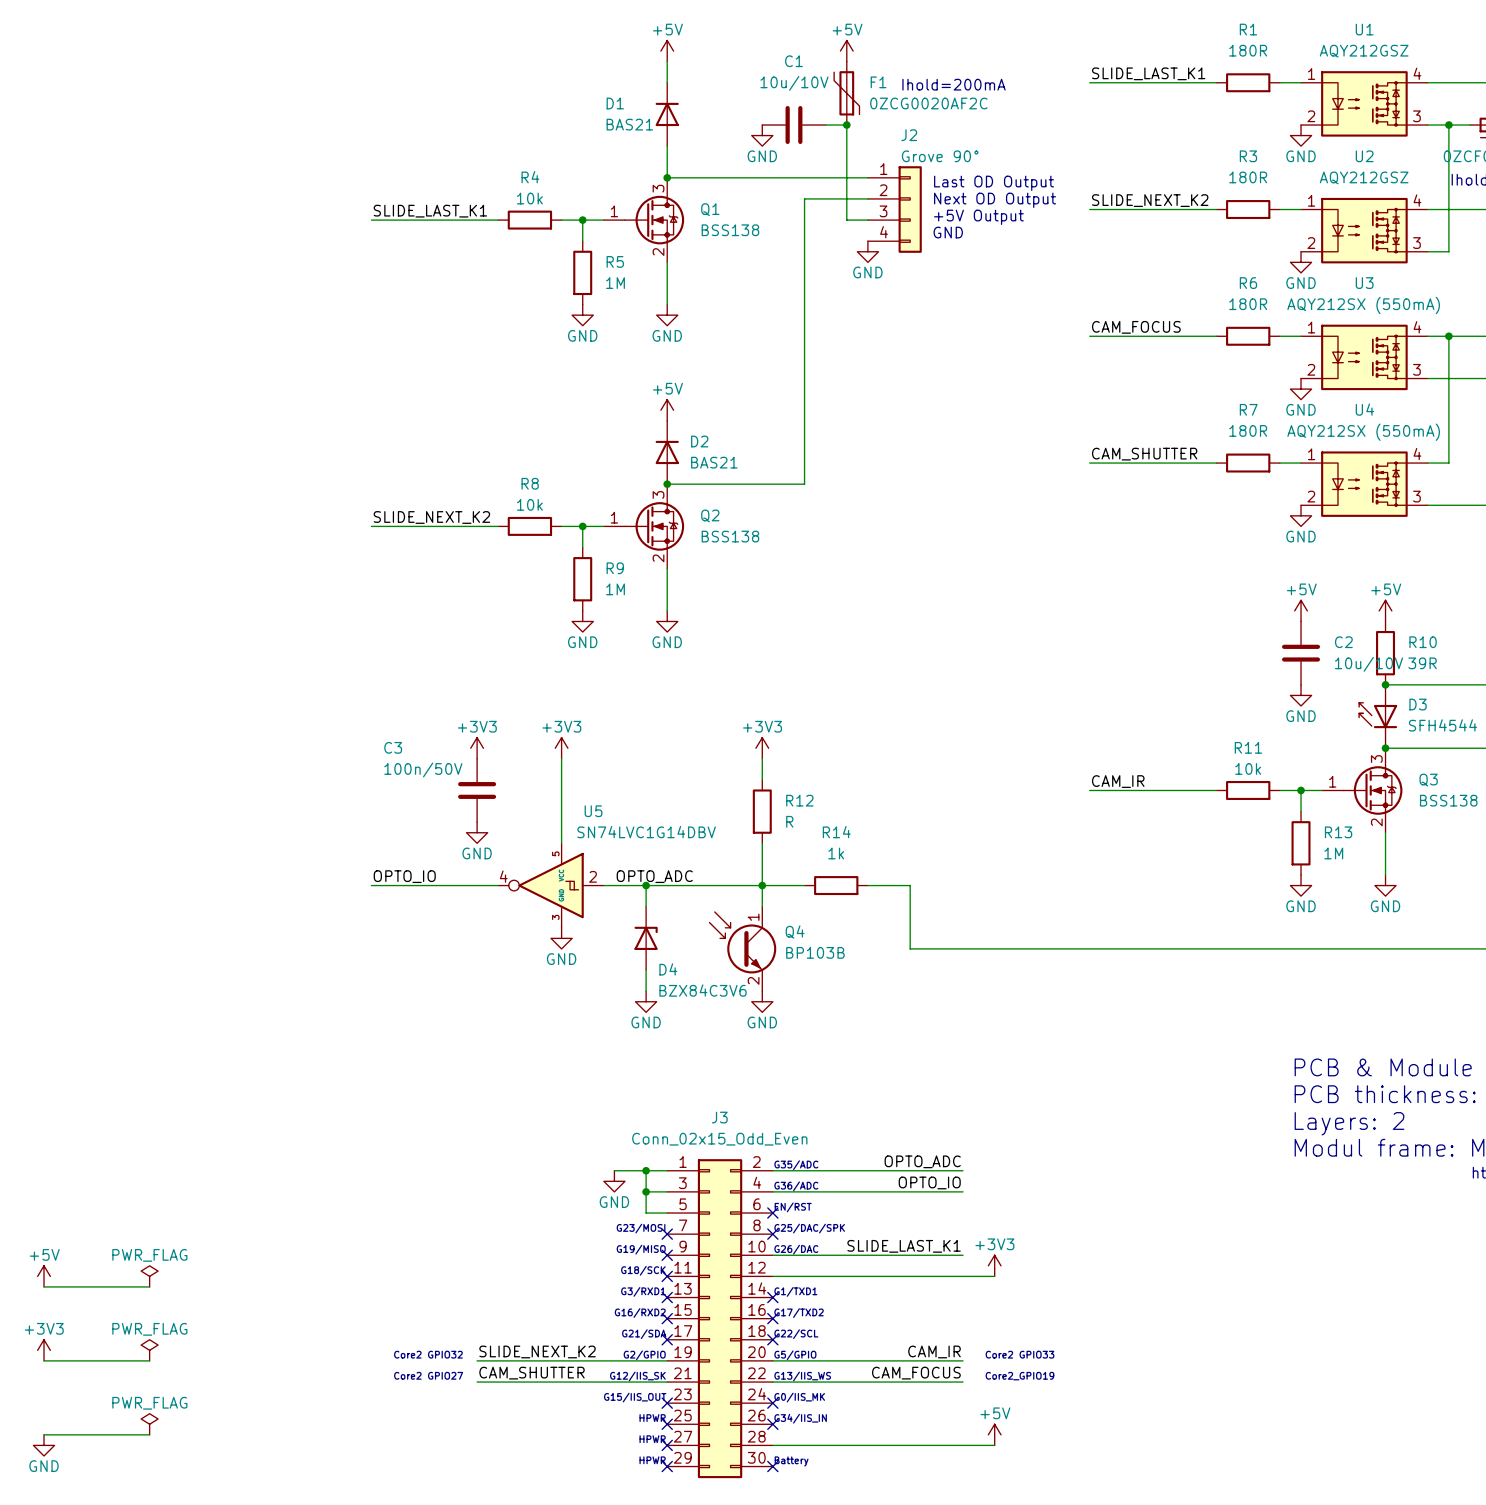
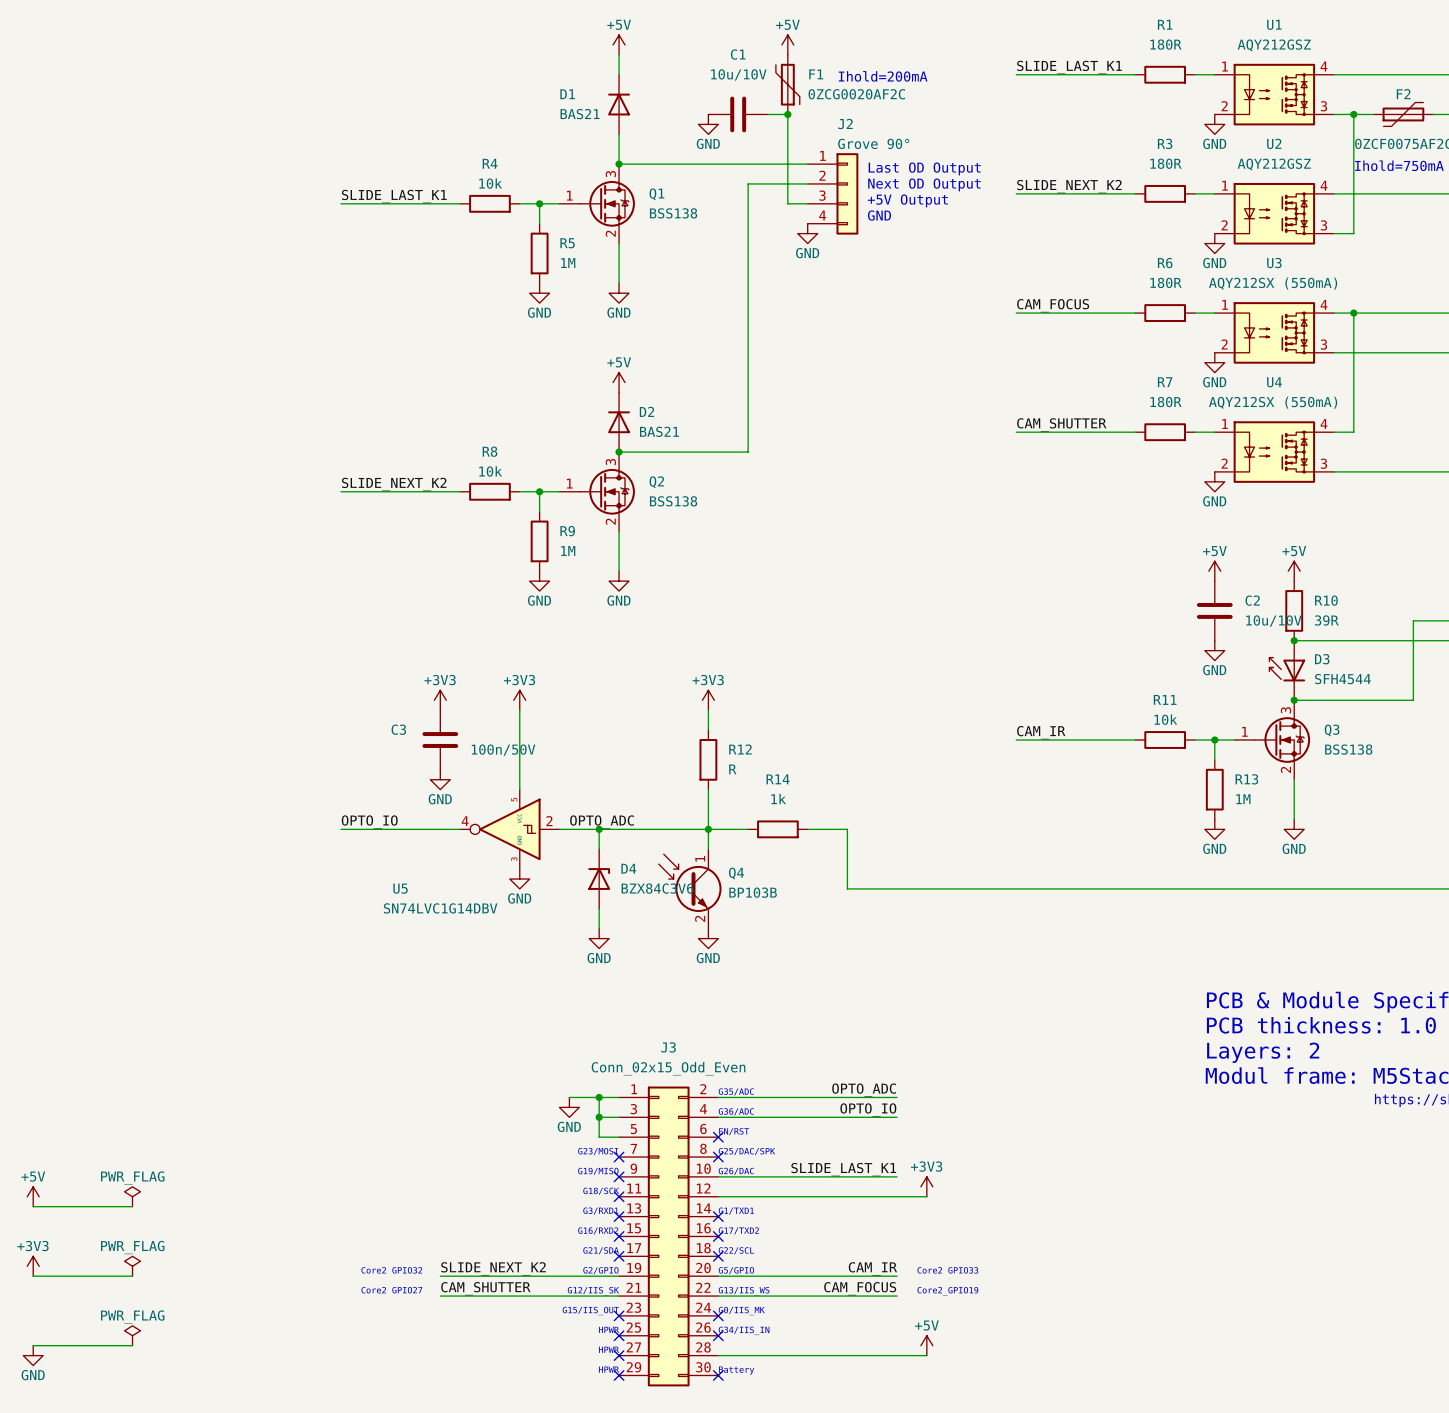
C3 name position: C3 (393, 747) -> C3 (398, 729)
C3 value position: 100n/50V (423, 769) -> 100n/50V (503, 750)
U5 name position: U5 (593, 811) -> U5 (400, 888)
U5 value position: SN74LVC1G14DBV (646, 832) -> SN74LVC1G14DBV (440, 908)
D4 name position: D4 (668, 969) -> D4 (628, 868)
D4 value position: BZX84C3V6 (703, 990) -> BZX84C3V6 (657, 888)

